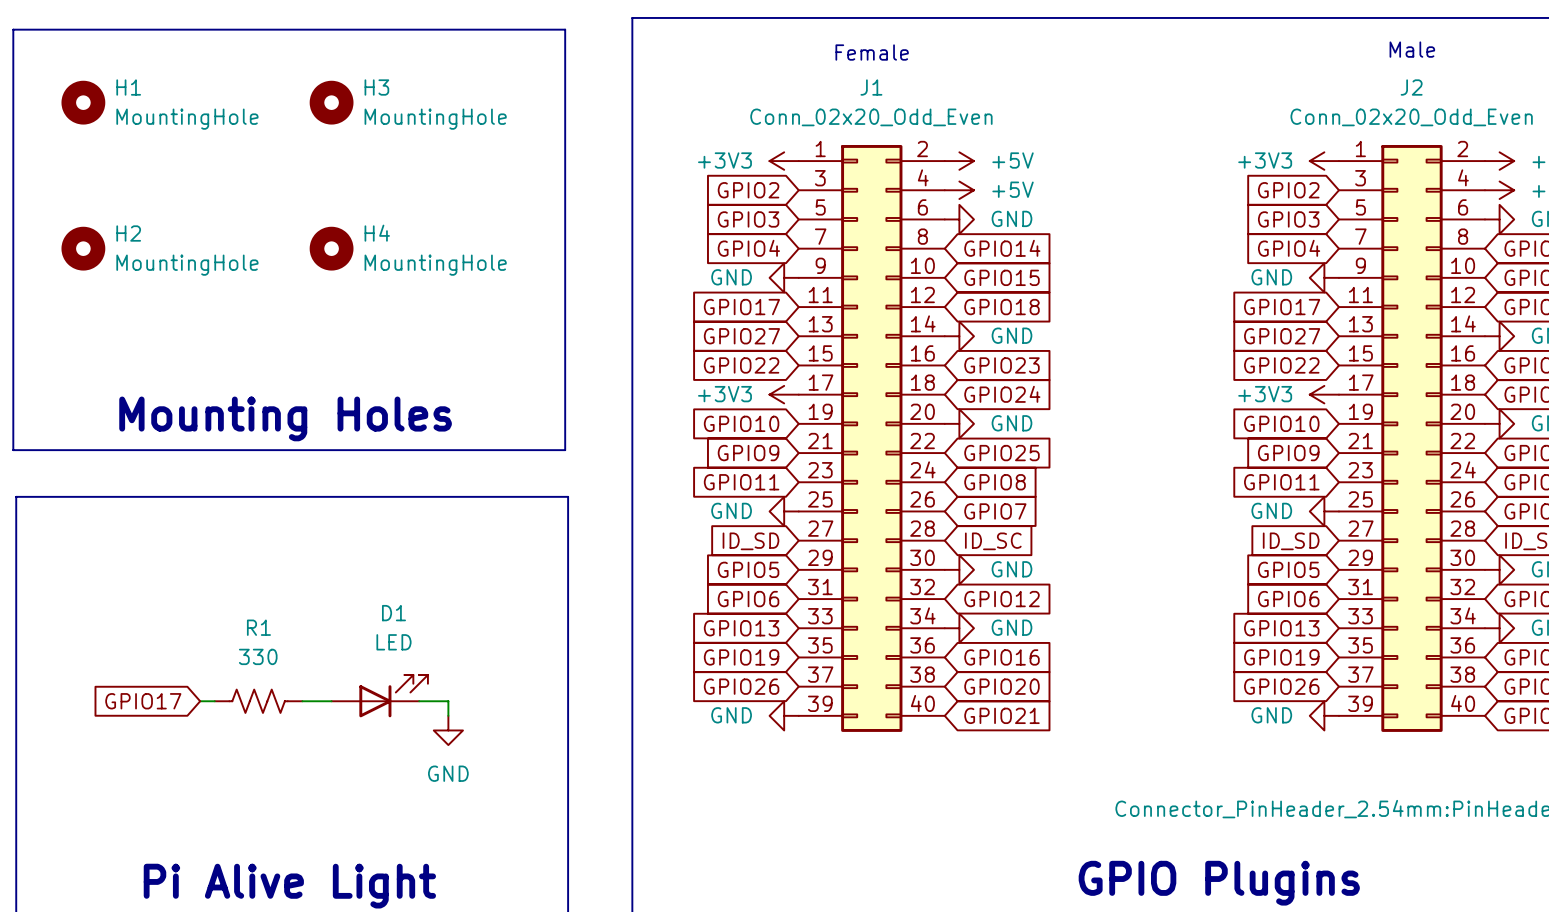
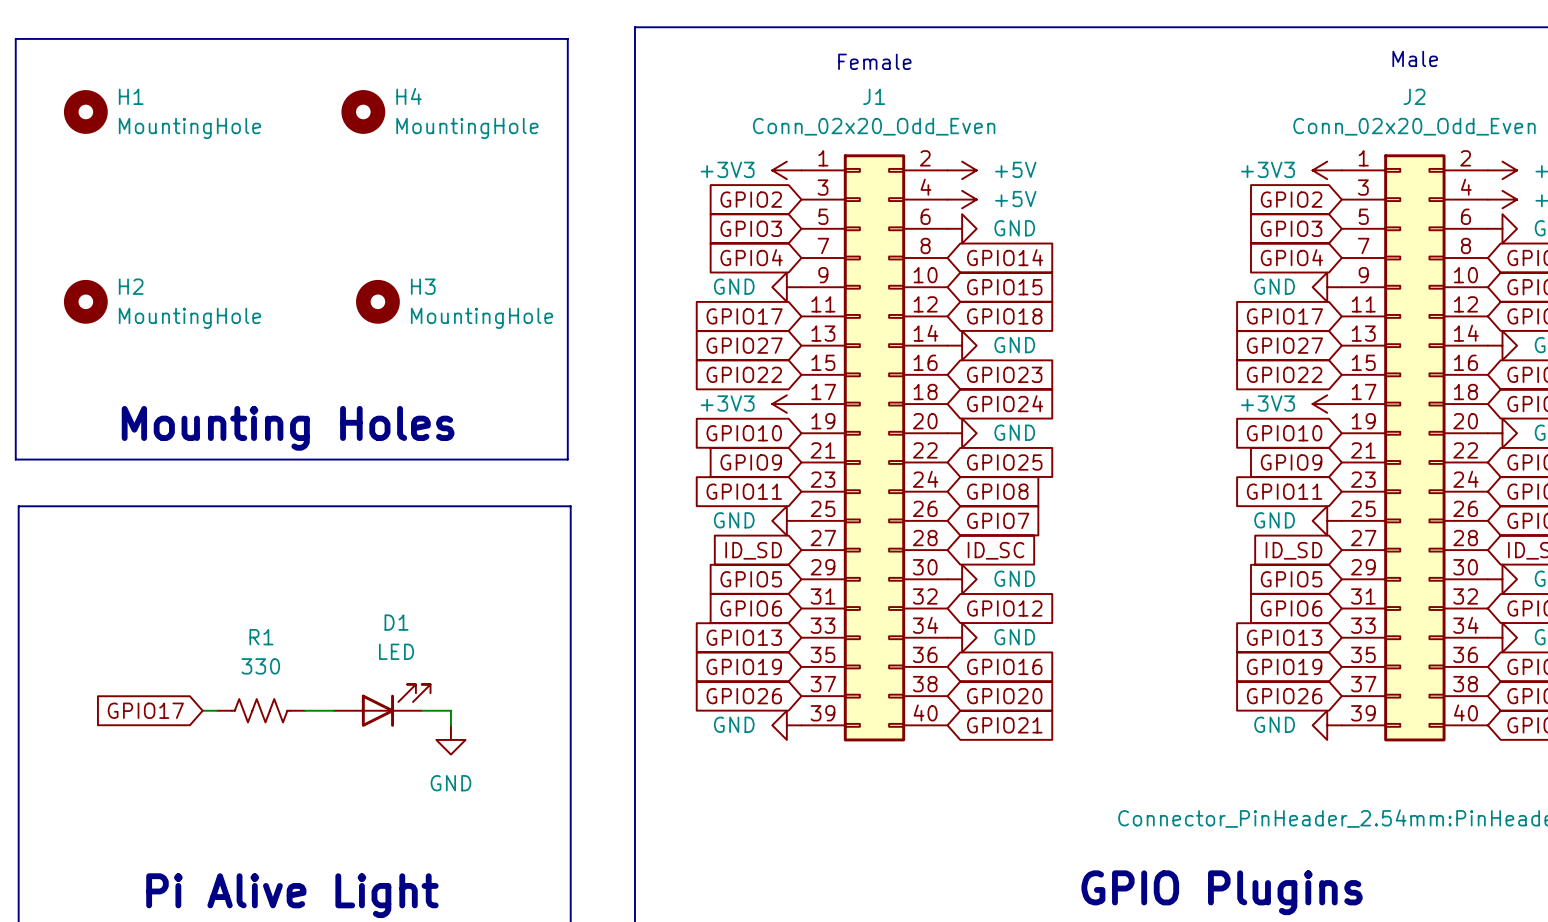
H3 position: (331, 102) -> (377, 301)
H2 position: (83, 248) -> (85, 301)
H4 position: (331, 248) -> (363, 111)

